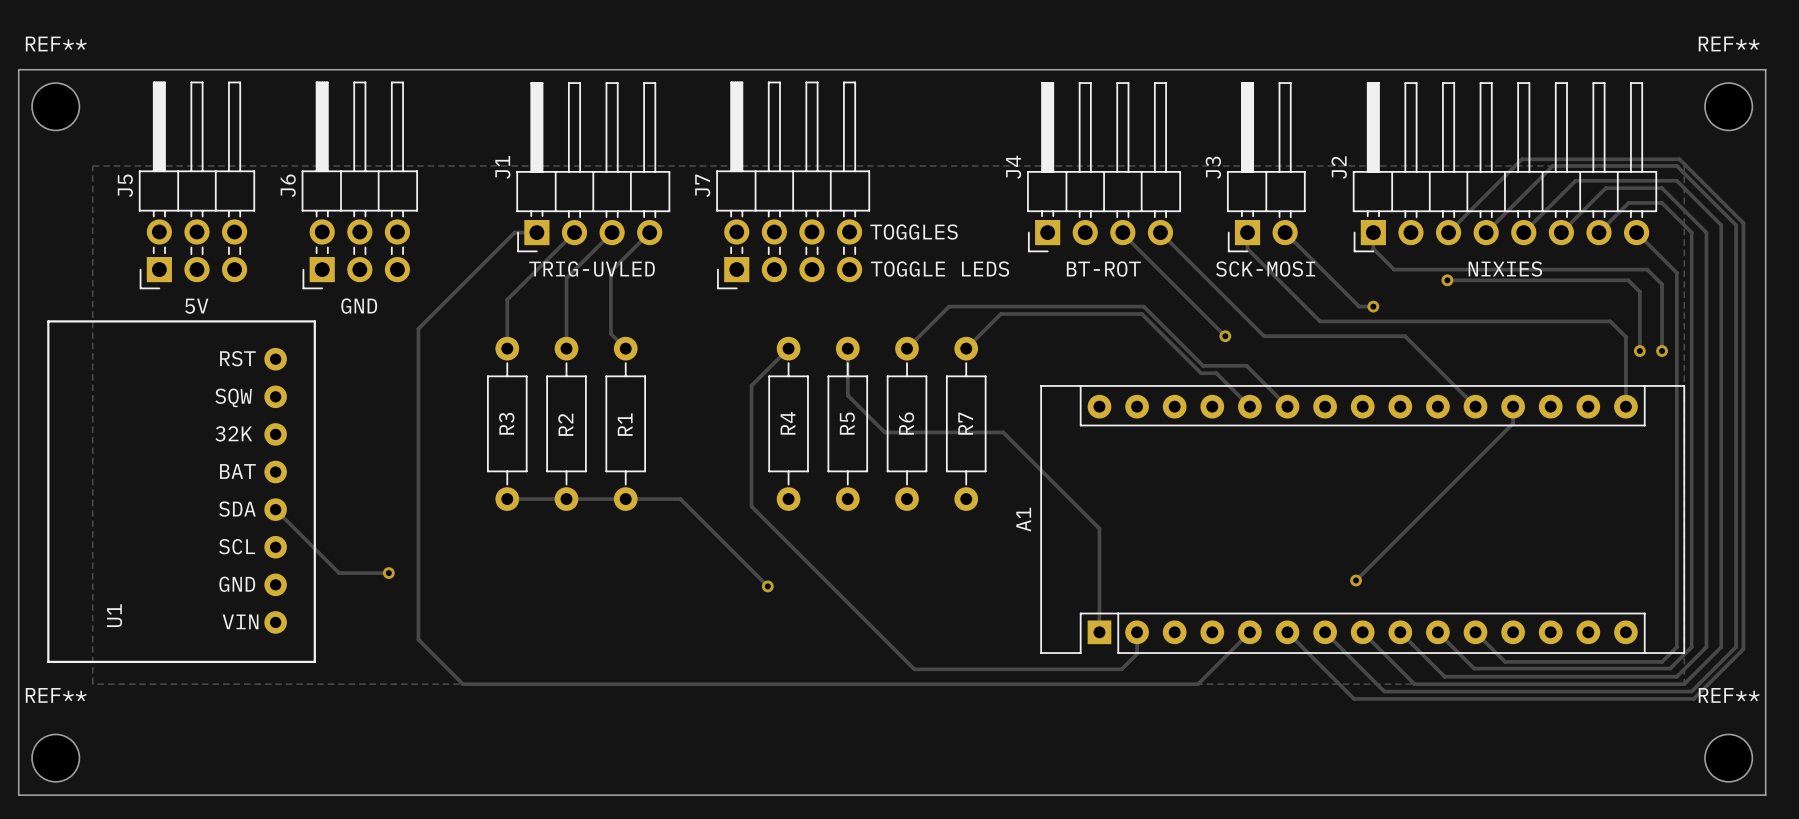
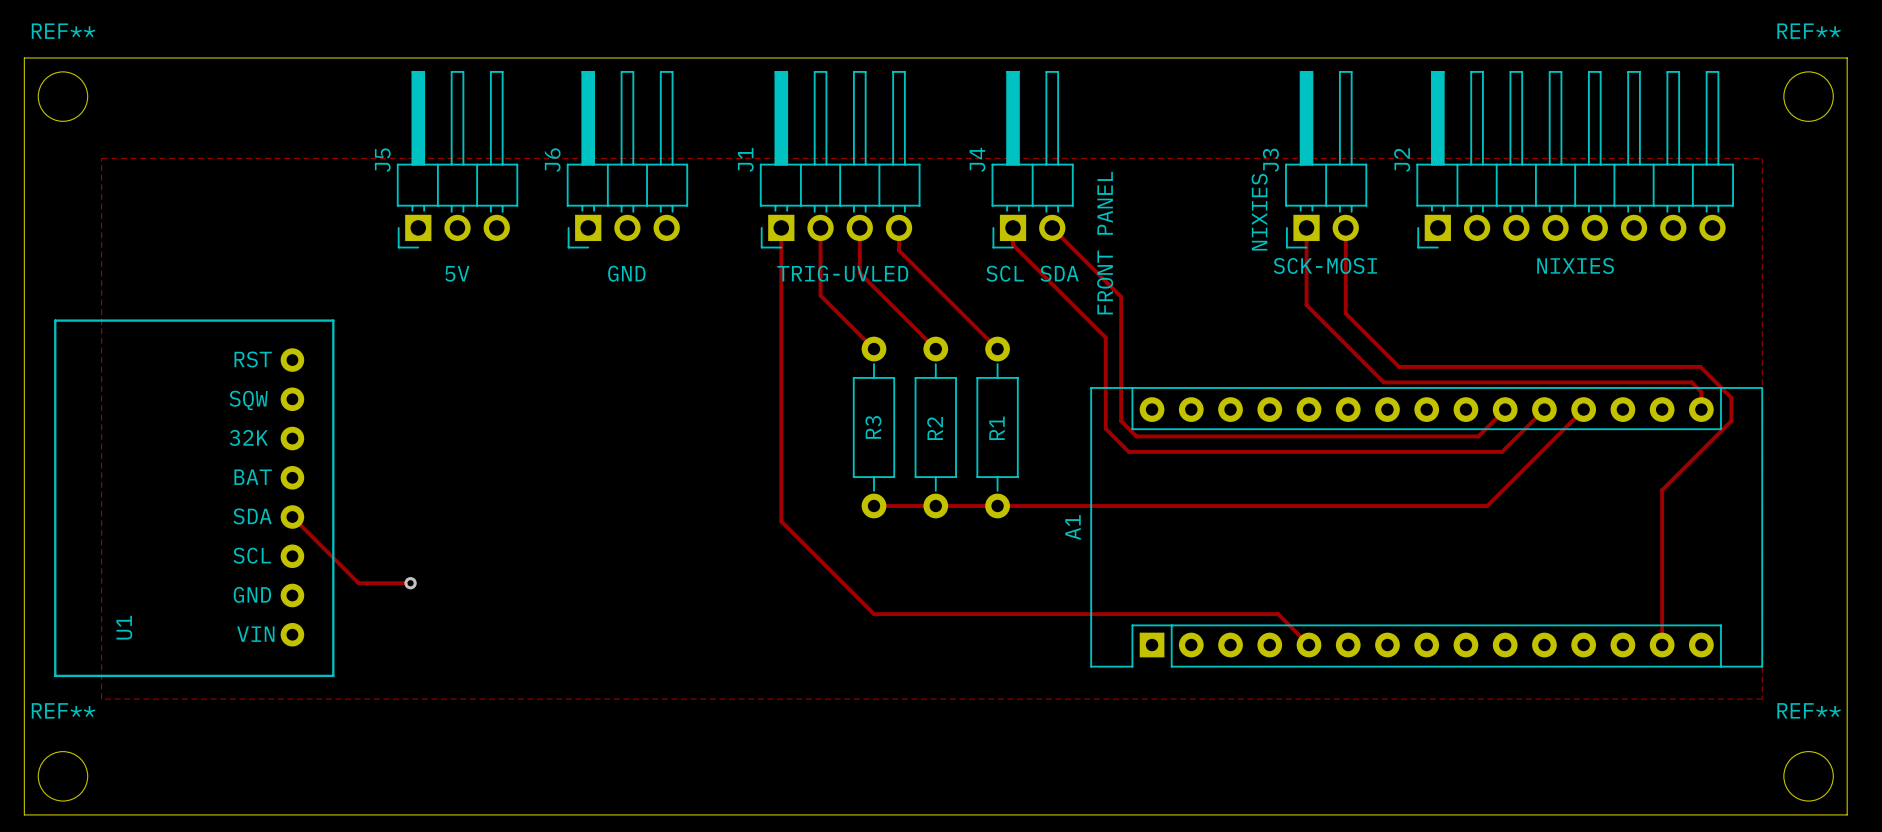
J5 footprint: [138, 81, 256, 290] -> [396, 70, 519, 249]
J6 footprint: [301, 81, 419, 290] -> [566, 70, 689, 249]
J4 footprint: [1027, 82, 1182, 253] -> [991, 70, 1074, 249]
J1 position: (593, 167) -> (840, 159)
J4 name position: J4 (1013, 167) -> J4 (977, 159)
J7: (793, 185) -> none
text: none -> NIXIES (1259, 212)
track: (536, 232) (514, 232) (418, 328) (418, 639) (462, 684) (1198, 684) (1249, 632) -> (781, 227) (781, 521) (873, 614) (1278, 614) (1309, 645)
track: (574, 232) (507, 299) (507, 348) -> none
track: (612, 232) (566, 278) (566, 348) -> none
track: (649, 232) (610, 271) (610, 333) (625, 348) -> none
track: none -> (820, 227) (820, 295) (873, 349)
track: none -> (859, 227) (859, 273) (935, 349)
track: none -> (899, 227) (899, 250) (997, 349)
text: TOGGLES (914, 232) -> none
track: none -> (1052, 227) (1121, 296) (1121, 421) (1136, 436) (1478, 436) (1505, 409)
track: (1122, 232) (1225, 336) -> none
track: (1160, 232) (1264, 336) (1405, 336) (1475, 406) -> (1013, 227) (1013, 244) (1105, 337) (1105, 428) (1128, 451) (1502, 451) (1544, 409)
track: (1285, 232) (1359, 306) (1373, 306) -> (1345, 227) (1345, 313) (1399, 366) (1700, 366) (1731, 397) (1731, 421) (1662, 490) (1662, 645)
track: (1373, 232) (1373, 248) (1394, 269) (1647, 269) (1662, 284) (1662, 351) -> none
track: (1448, 232) (1521, 159) (1679, 159) (1743, 223) (1743, 649) (1693, 698) (1354, 698) (1287, 632) -> none
track: (1486, 232) (1552, 165) (1676, 165) (1736, 225) (1736, 647) (1691, 691) (1384, 691) (1325, 632) -> none
track: (1523, 232) (1575, 180) (1676, 180) (1721, 225) (1721, 647) (1684, 684) (1414, 684) (1362, 632) -> none
track: (1561, 232) (1605, 188) (1662, 188) (1706, 232) (1706, 647) (1676, 676) (1444, 676) (1400, 632) -> none
track: (1598, 232) (1628, 202) (1662, 202) (1691, 232) (1691, 647) (1670, 668) (1474, 668) (1437, 632) -> none
track: (1636, 232) (1676, 272) (1676, 647) (1662, 661) (1505, 661) (1475, 632) -> none
text: none -> FRONT PANEL (1105, 243)
track: (1247, 248) (1320, 321) (1610, 321) (1625, 337) (1625, 389) -> (1306, 244) (1306, 305) (1383, 382) (1691, 382) (1701, 392)
text position: TRIG-UVLED (592, 269) -> TRIG-UVLED (842, 273)
text: TOGGLE LEDS (939, 269) -> none
text: BT-ROT (1103, 269) -> none
text: none -> SCL (1005, 273)
text: none -> SDA (1059, 273)
track: (1447, 280) (1628, 280) (1639, 291) (1639, 351) -> none
via: (1447, 280) -> none
text position: 5V (196, 306) -> 5V (457, 273)
text position: GND (359, 306) -> GND (626, 273)
via: (1373, 306) -> none
via: (1225, 336) -> none
track: (788, 348) (751, 385) (751, 506) (914, 669) (1121, 669) (1137, 653) (1137, 632) -> none
track: (847, 348) (847, 395) (884, 432) (1003, 432) (1099, 528) (1099, 632) -> none
track: (907, 348) (949, 306) (1143, 306) (1203, 365) (1246, 365) (1287, 406) -> none
track: (966, 348) (1000, 314) (1141, 314) (1201, 373) (1216, 373) (1249, 406) -> none
via: (1639, 351) -> none
via: (1662, 351) -> none
track: (1513, 406) (1513, 423) (1356, 580) -> (1583, 409) (1487, 505) (873, 505)
R3 position: (507, 423) -> (873, 427)
R2 position: (566, 423) -> (935, 427)
R1 position: (625, 423) -> (997, 427)
R4: (788, 423) -> none
R5: (847, 423) -> none
R6: (907, 423) -> none
R7: (966, 423) -> none
track: (507, 499) (680, 499) (767, 586) -> none
via: (1356, 580) -> none
via: (767, 586) -> none

